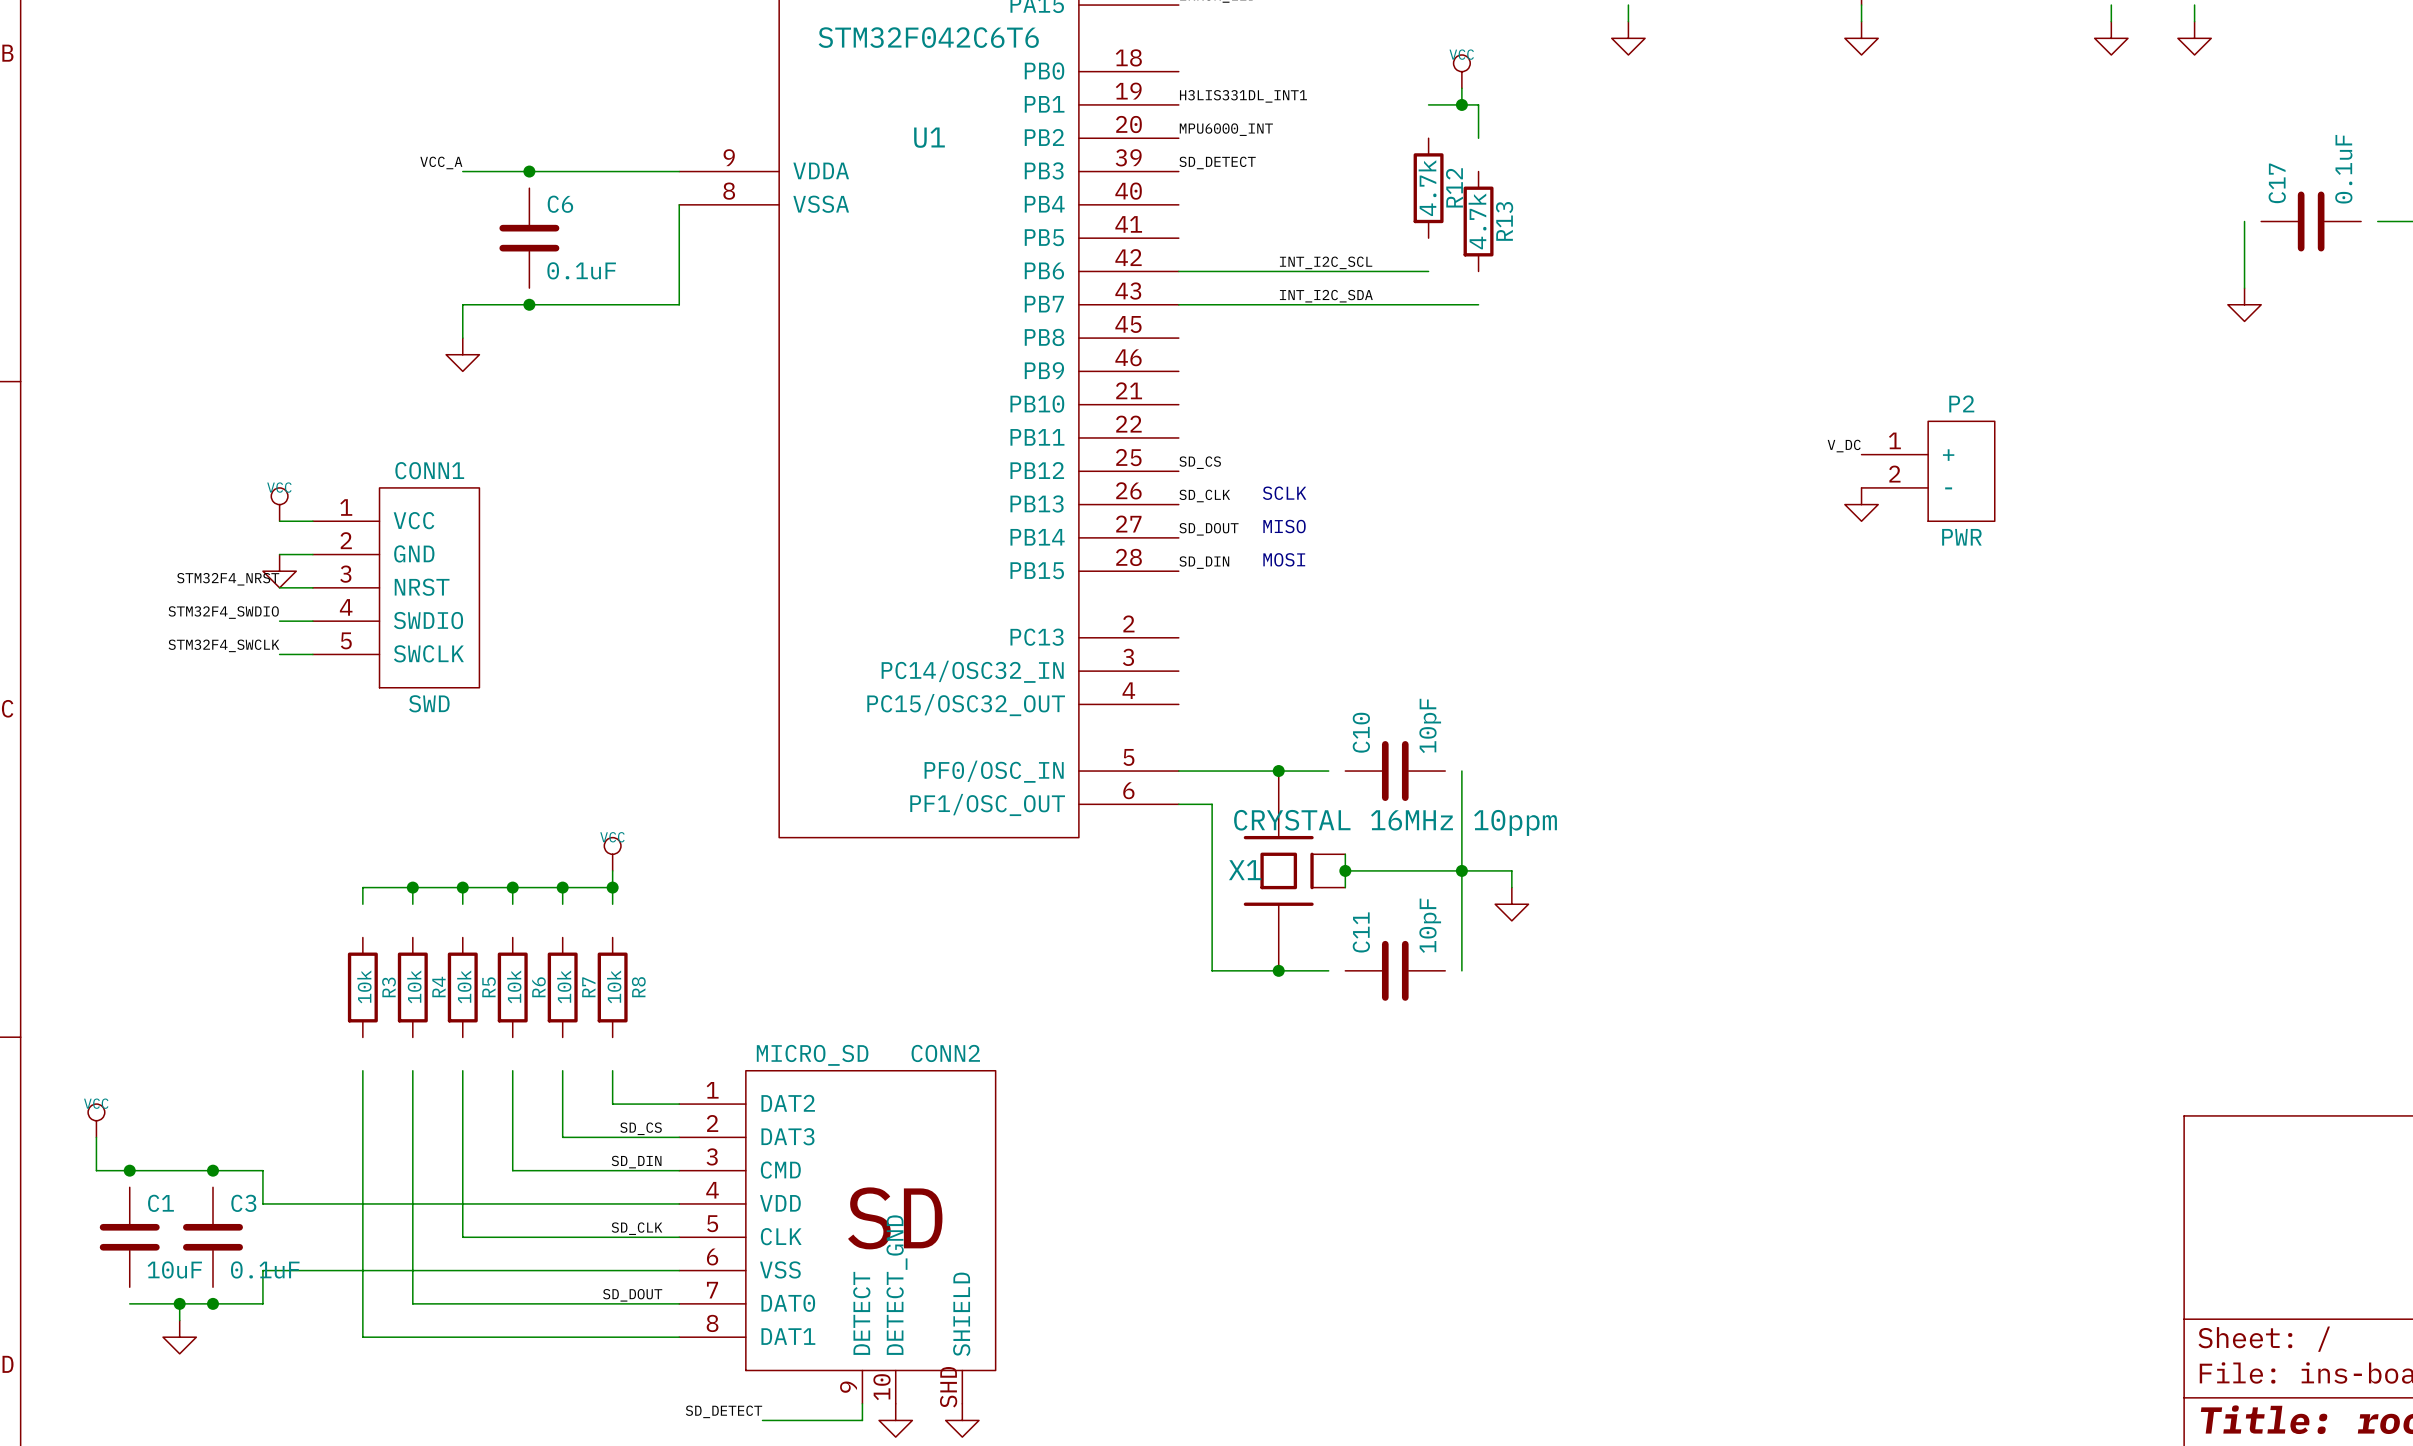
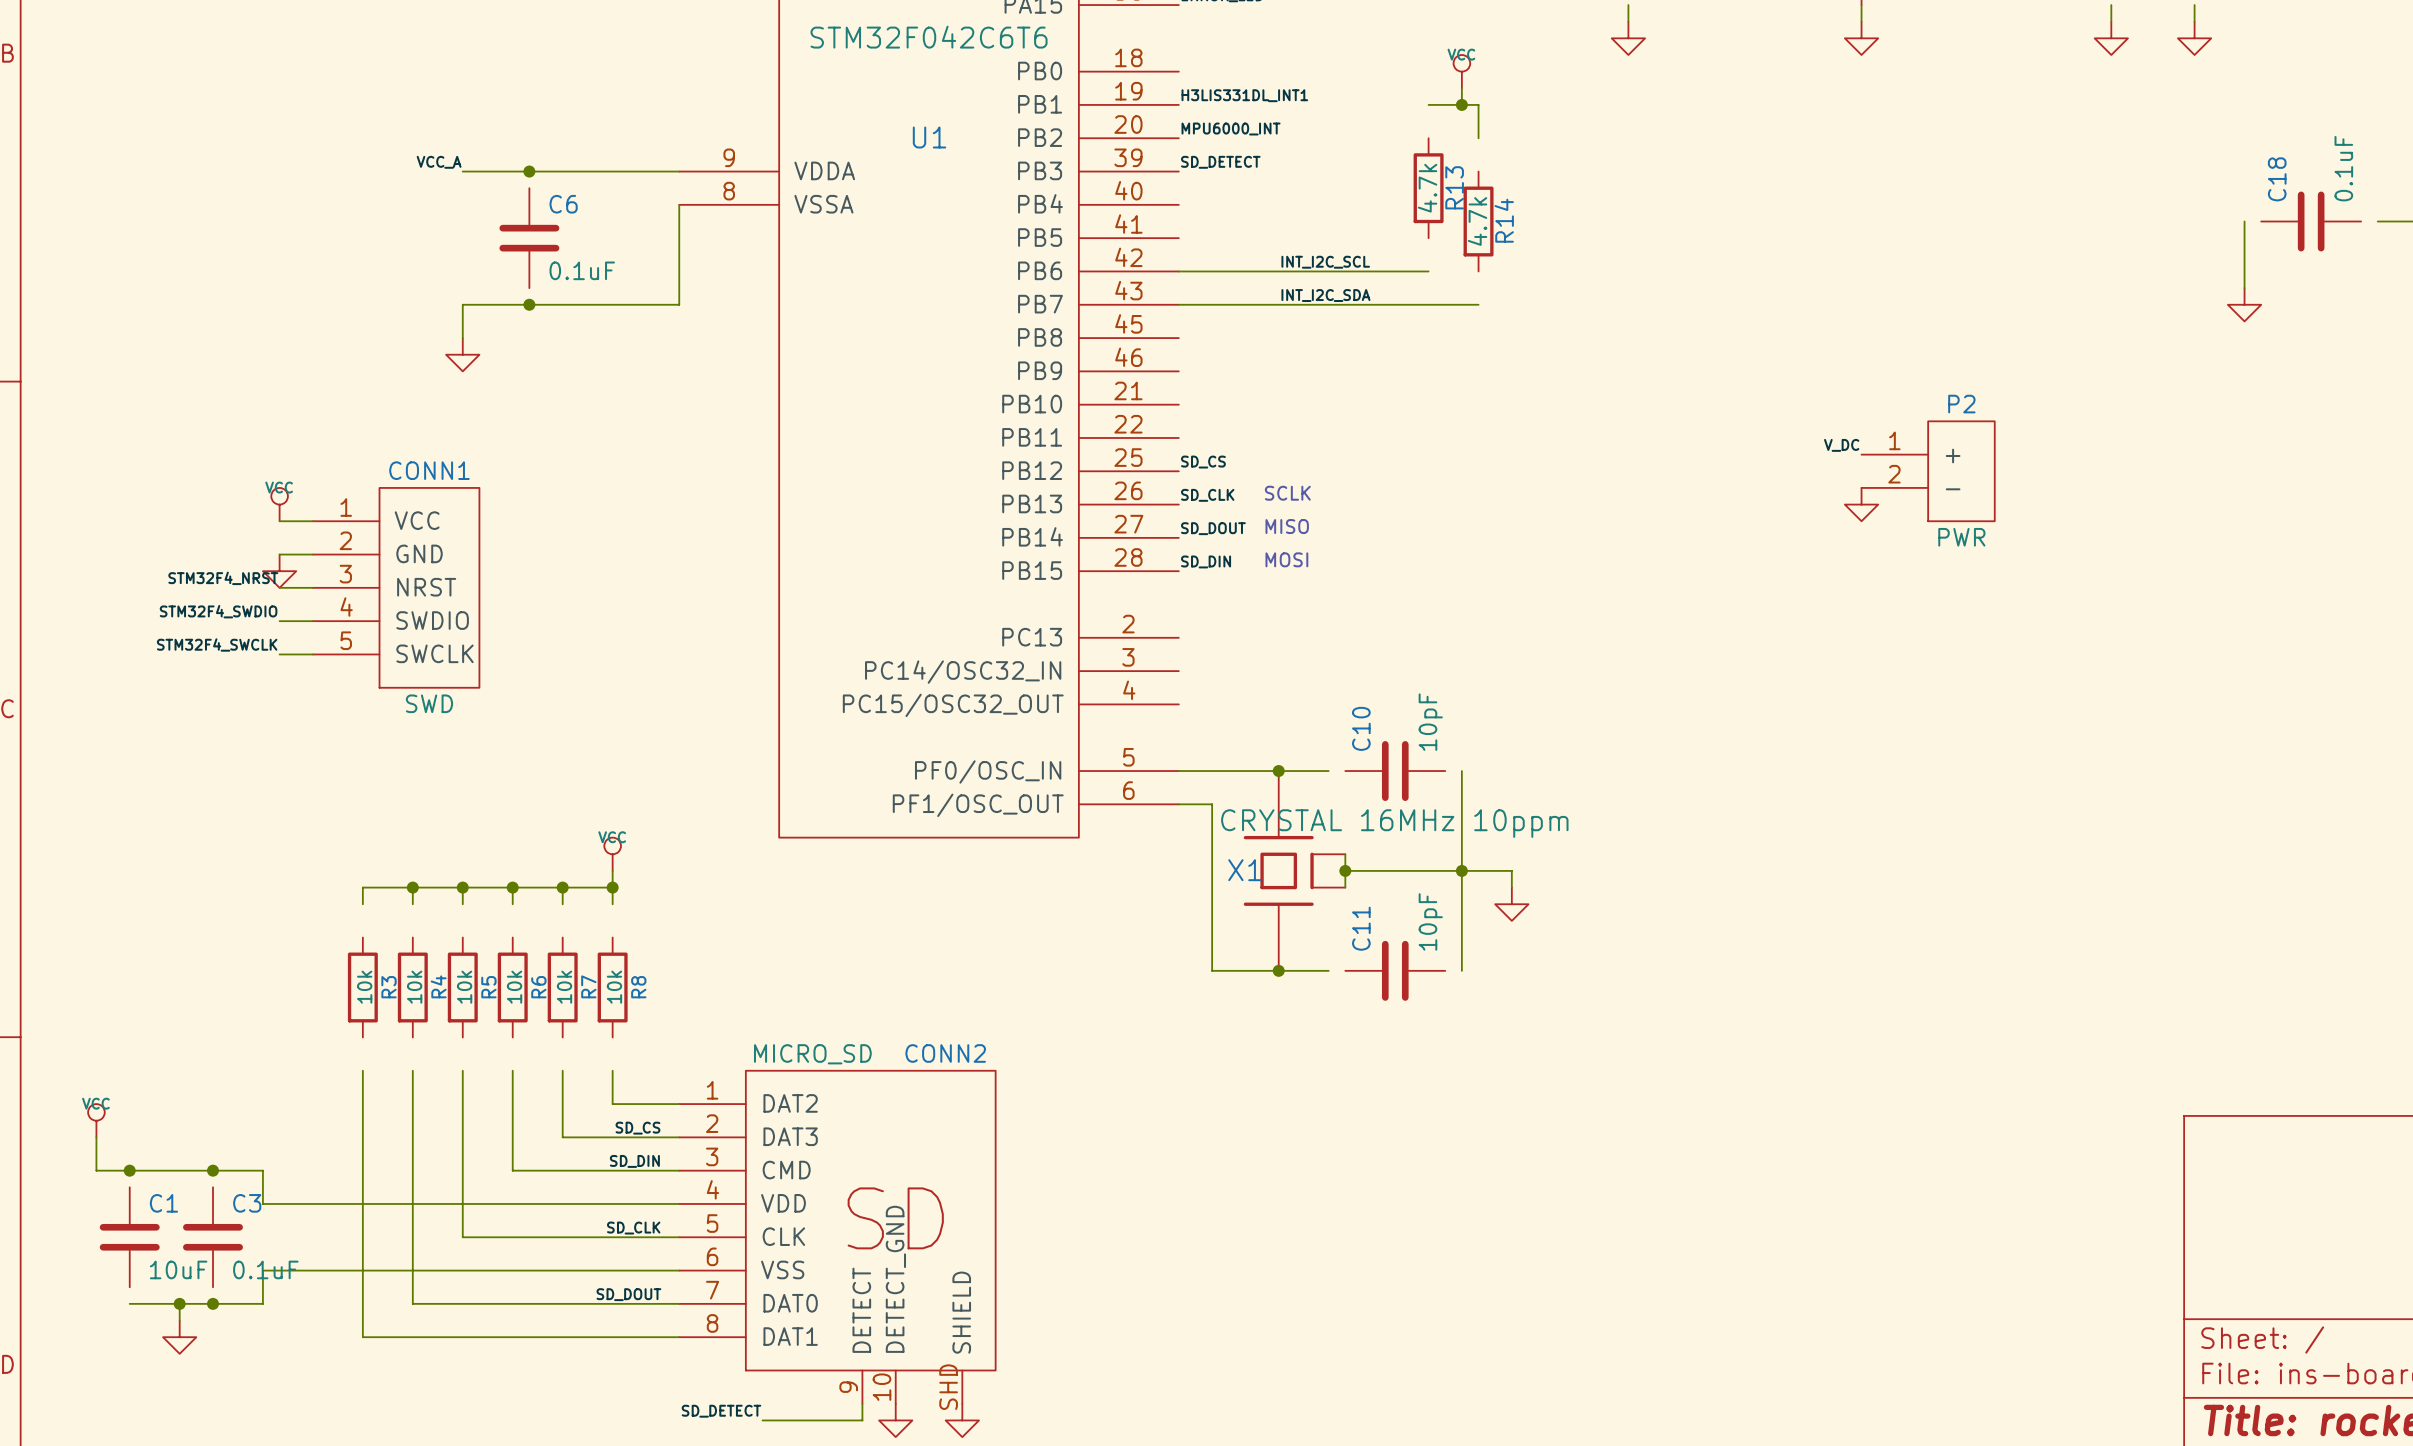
C17 name: C17 (2277, 183) -> C18 (2277, 179)
R12 name: R12 (1454, 187) -> R13 (1454, 187)
R13 name: R13 (1504, 221) -> R14 (1504, 220)

